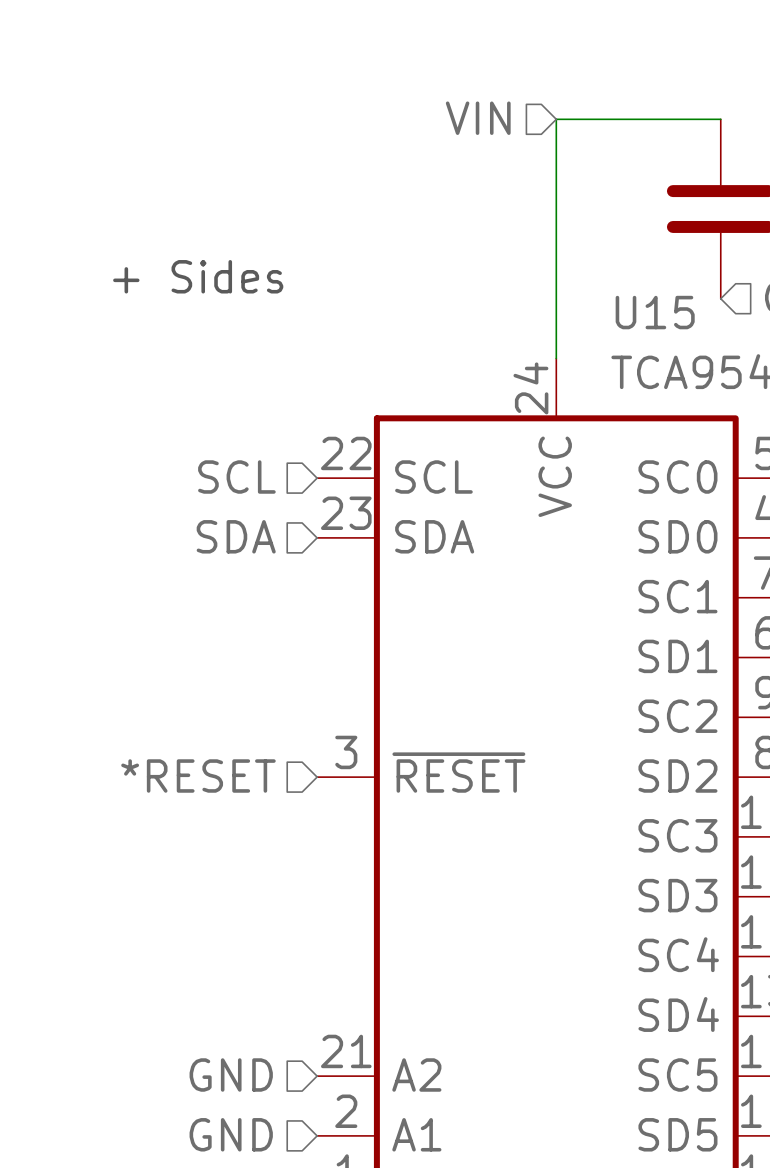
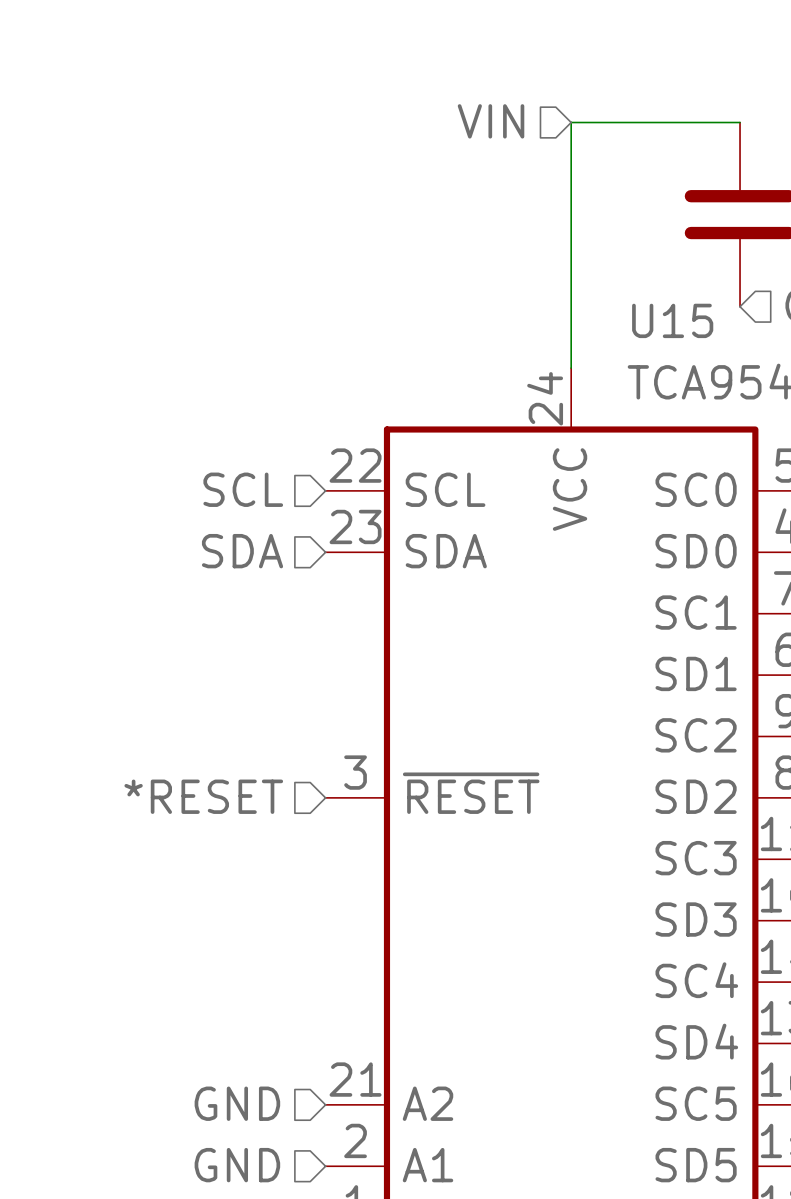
text: + Sides (198, 276) -> none

